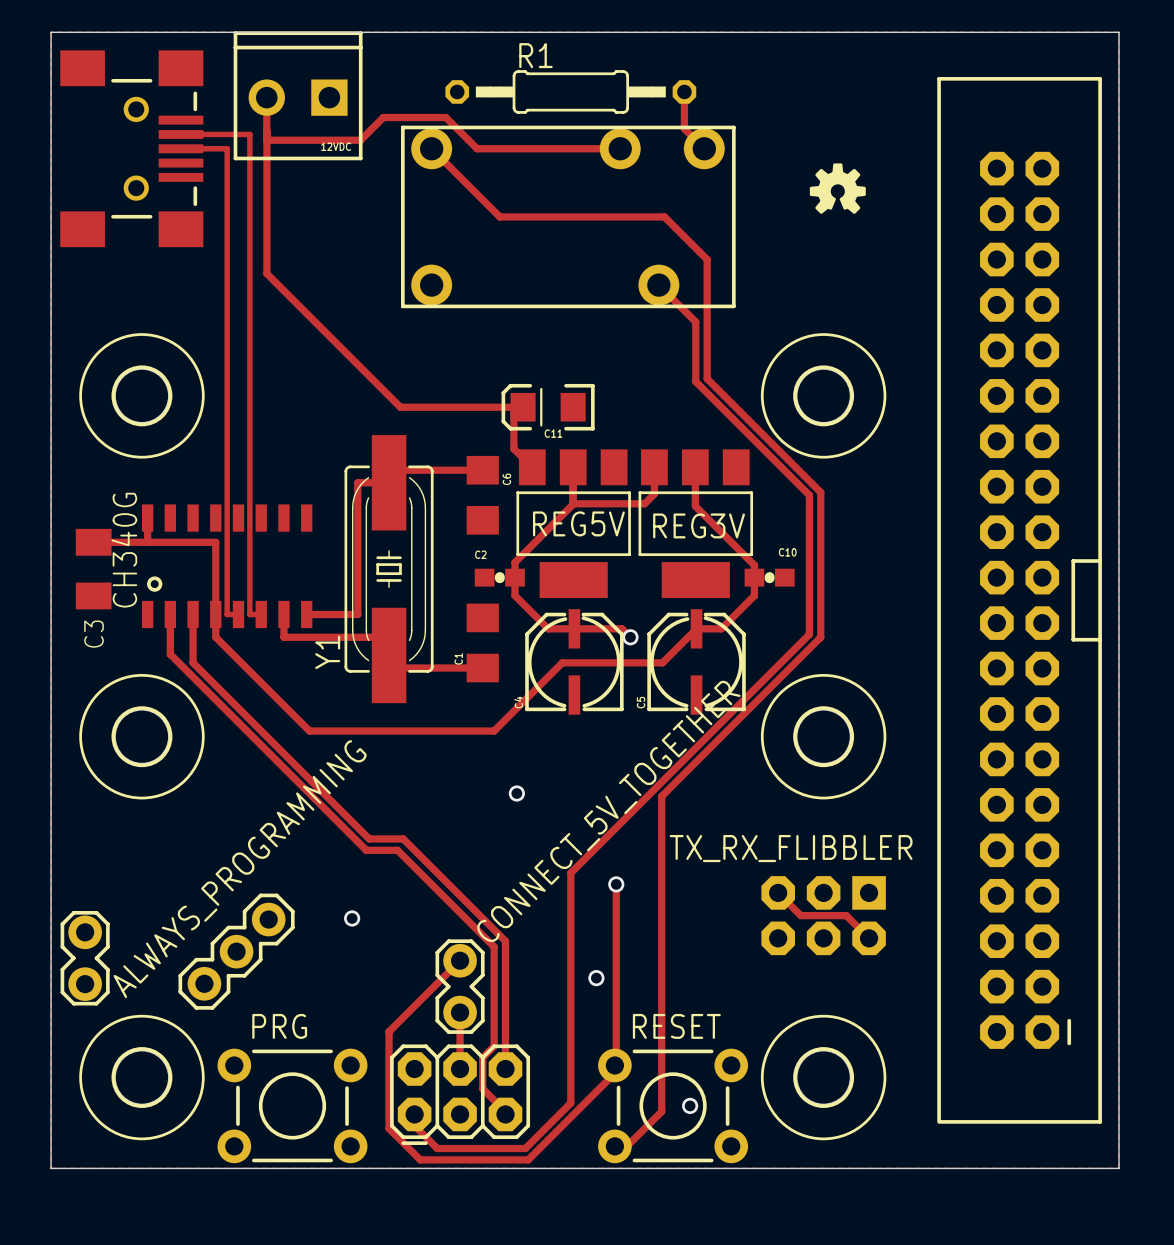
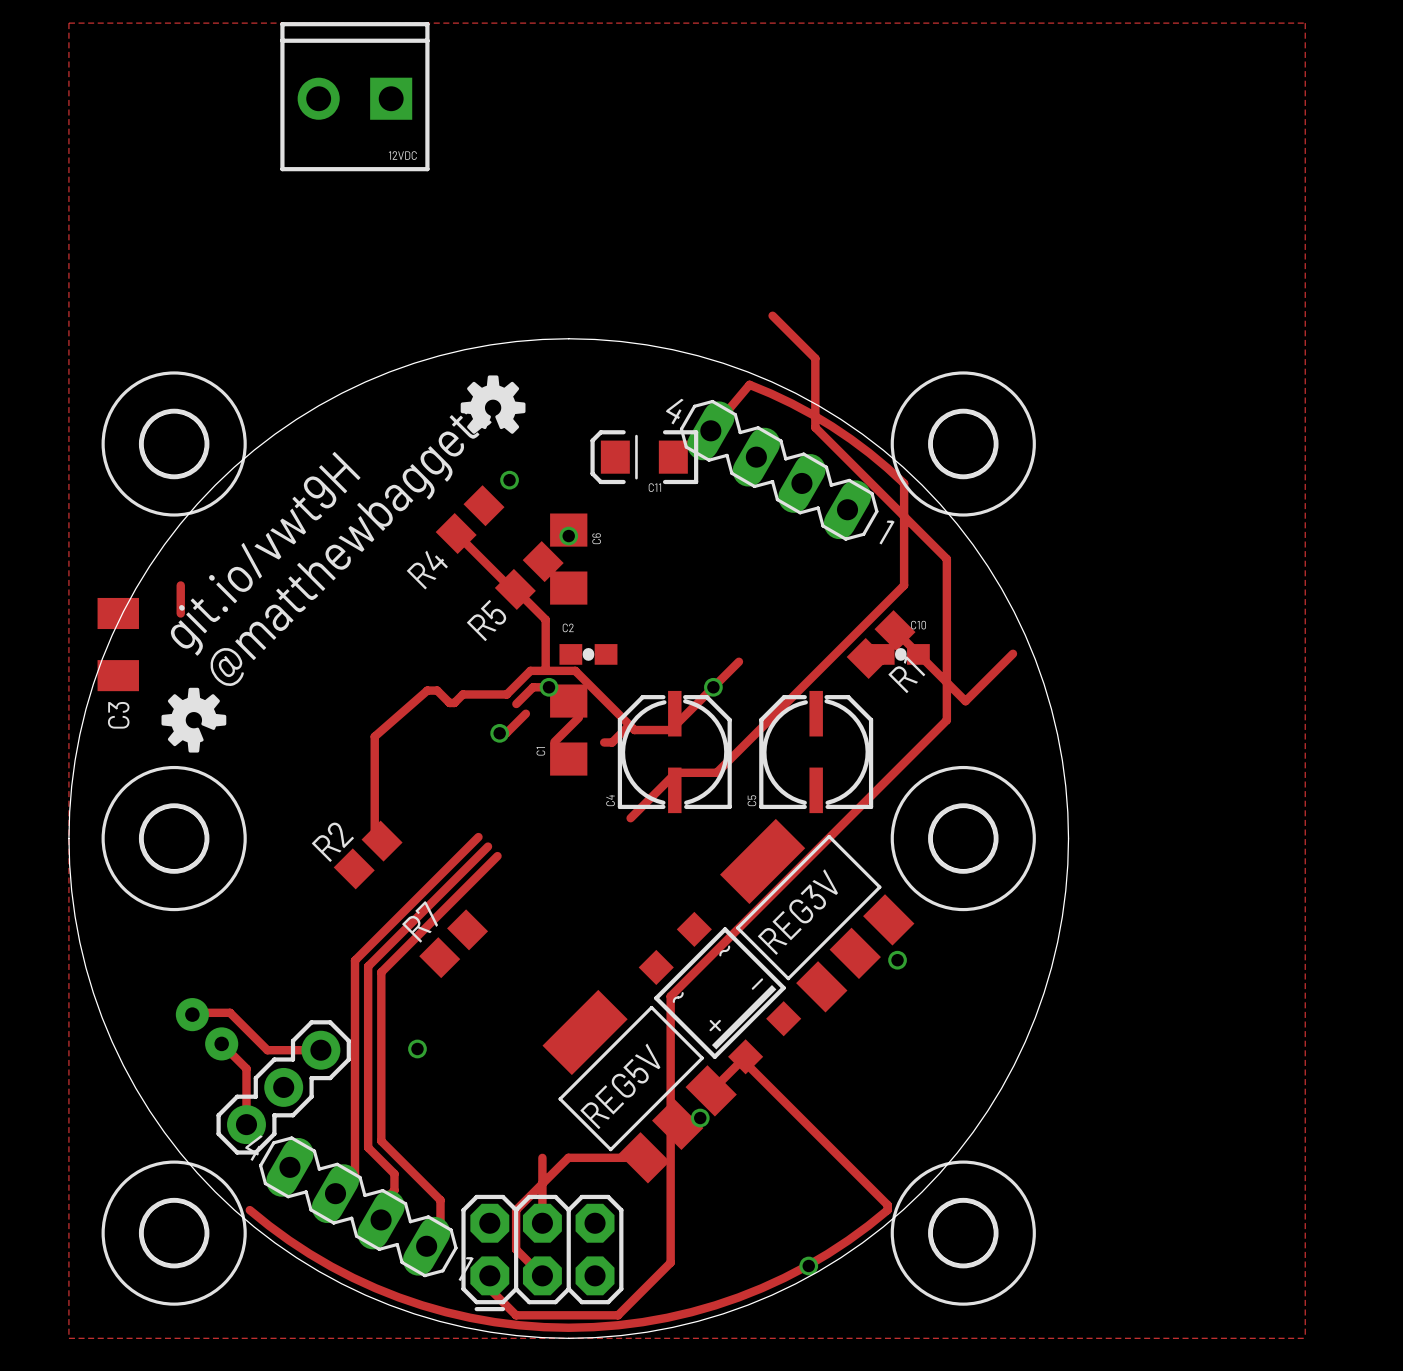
board edge: (51, 32) (1119, 32) (1119, 1168) (51, 1168) (51, 32) -> (568, 338) (516, 341) (464, 349) (414, 363) (365, 381) (318, 405) (274, 434) (215, 485) (164, 544) (135, 588) (112, 635) (93, 684) (79, 734) (71, 786) (68, 838) (71, 890) (79, 942) (93, 992) (112, 1041) (135, 1088) (164, 1132) (215, 1191) (274, 1242) (318, 1271) (365, 1295) (414, 1313) (464, 1327) (516, 1335) (568, 1338) (620, 1335) (672, 1327) (723, 1313) (772, 1295) (818, 1271) (862, 1242) (922, 1191) (973, 1132) (1001, 1088) (1025, 1041) (1044, 992) (1057, 942) (1065, 890) (1068, 838) (1065, 786) (1057, 734) (1044, 684) (1025, 635) (1001, 588) (973, 544) (922, 485) (862, 434) (818, 405) (772, 381) (723, 363) (672, 349) (620, 341) (568, 338)
R1 name position: R1 (535, 55) -> R1 (906, 674)
R1 footprint: [445, 70, 697, 114] -> [846, 610, 916, 679]
track: (684, 91) (684, 128) (704, 148) -> none
track: (266, 97) (266, 140) (360, 140) (383, 117) (445, 117) (477, 148) (620, 148) -> none
track: (266, 131) (266, 273) (400, 407) (523, 407) (517, 412) (513, 412) (513, 448) (532, 467) -> none
track: (181, 134) (249, 134) (249, 614) (261, 614) -> none
part: (131, 148) -> none
track: (181, 148) (227, 148) (227, 614) (238, 614) -> none
track: (431, 148) (499, 216) (664, 216) (707, 259) (707, 378) (820, 492) (820, 637) (661, 796) (661, 1111) (626, 1146) (614, 1146) -> none
drawing: [809, 163, 866, 214] -> none
part: (568, 216) -> none
drawing: none -> [460, 375, 526, 434]
track: none -> (710, 430) (749, 384) (812, 414) (869, 453) (904, 483) (904, 585) (716, 772) (676, 772) (630, 818)
part: none -> (779, 470)
via: none -> (509, 480)
R4: none -> (470, 519)
text: none -> @matthewbaggett (350, 544)
track: (573, 467) (573, 504) (515, 562) (515, 595) (548, 628) (622, 628) (630, 637) -> none
track: (654, 467) (654, 494) (644, 503) (573, 503) -> none
track: (695, 467) (695, 506) (754, 565) (754, 595) (721, 628) (696, 628) (662, 662) (562, 662) (494, 731) (309, 731) (215, 637) (215, 542) (93, 542) -> none
track: (482, 470) (389, 470) (389, 482) (357, 482) (357, 614) (306, 614) -> none
track: none -> (456, 533) (545, 619) (545, 670)
text: none -> git.io/vwt9H (265, 553)
via: none -> (568, 536)
R5: none -> (529, 575)
REG5V rotation: 0° (573, 523) -> 135° clockwise (639, 1086)
REG5V position: (573, 523) -> (639, 1086)
REG3V rotation: 0° (695, 523) -> 135° clockwise (817, 915)
REG3V position: (695, 523) -> (817, 915)
track: none -> (895, 630) (965, 701) (1012, 653)
part: (227, 566) -> none
Y1: (389, 569) -> none
track: none -> (738, 661) (670, 730) (634, 730) (575, 670) (530, 670) (506, 694) (462, 694) (454, 702) (449, 702) (437, 690) (427, 690) (374, 736) (374, 833) (382, 841)
part: (1019, 600) -> none
drawing: none -> [161, 687, 227, 753]
track: none -> (549, 687) (533, 687) (516, 704)
via: none -> (549, 687)
track: (170, 614) (170, 654) (366, 850) (397, 850) (494, 946) (494, 1046) (482, 1057) (482, 1088) (505, 1111) (505, 1114) -> none
track: (193, 614) (193, 662) (369, 838) (403, 838) (505, 941) (505, 1069) -> none
track: (283, 614) (283, 637) (389, 637) (389, 668) (482, 668) -> none
track: none -> (525, 713) (506, 733) (499, 733)
track: none -> (578, 717) (554, 742)
via position: (630, 637) -> (713, 687)
track: none -> (629, 725) (612, 742) (604, 742)
via: none -> (499, 733)
track: none -> (478, 837) (355, 960) (355, 1174) (335, 1193)
track: none -> (488, 846) (368, 966) (368, 1147) (394, 1173) (394, 1190) (381, 1203) (381, 1219)
R2: none -> (368, 854)
track: none -> (497, 856) (381, 972) (381, 1141) (440, 1200) (440, 1223) (426, 1237) (426, 1246)
via: (516, 793) -> none
R7: none -> (453, 943)
via: none -> (897, 960)
part: none -> (719, 993)
track: (616, 884) (614, 1073) (528, 1159) (420, 1159) (389, 1128) (389, 1031) (460, 960) -> none
via: (616, 884) -> none
track: none -> (192, 1014) (194, 1012) (230, 1012) (267, 1050) (320, 1050)
track: (778, 892) (800, 915) (846, 915) (869, 938) -> none
part: none -> (207, 1029)
track: none -> (221, 1043) (246, 1068) (246, 1124)
TX_RX_FLIBBLER: (823, 915) -> none
track: none -> (711, 1090) (745, 1056) (745, 1063) (887, 1205) (887, 1210) (827, 1253) (784, 1277) (738, 1297) (667, 1317) (618, 1325) (568, 1327) (519, 1325) (470, 1317) (398, 1297) (331, 1266) (289, 1240) (249, 1210)
ALWAYS_PROGRAMMING: (85, 958) -> none
CONNECT_5V_TOGETHER: (460, 986) -> none
track: none -> (644, 1157) (568, 1157) (516, 1210) (516, 1249) (542, 1275)
part: none -> (358, 1206)
PRG: (292, 1105) -> none
RESET: (673, 1105) -> none

